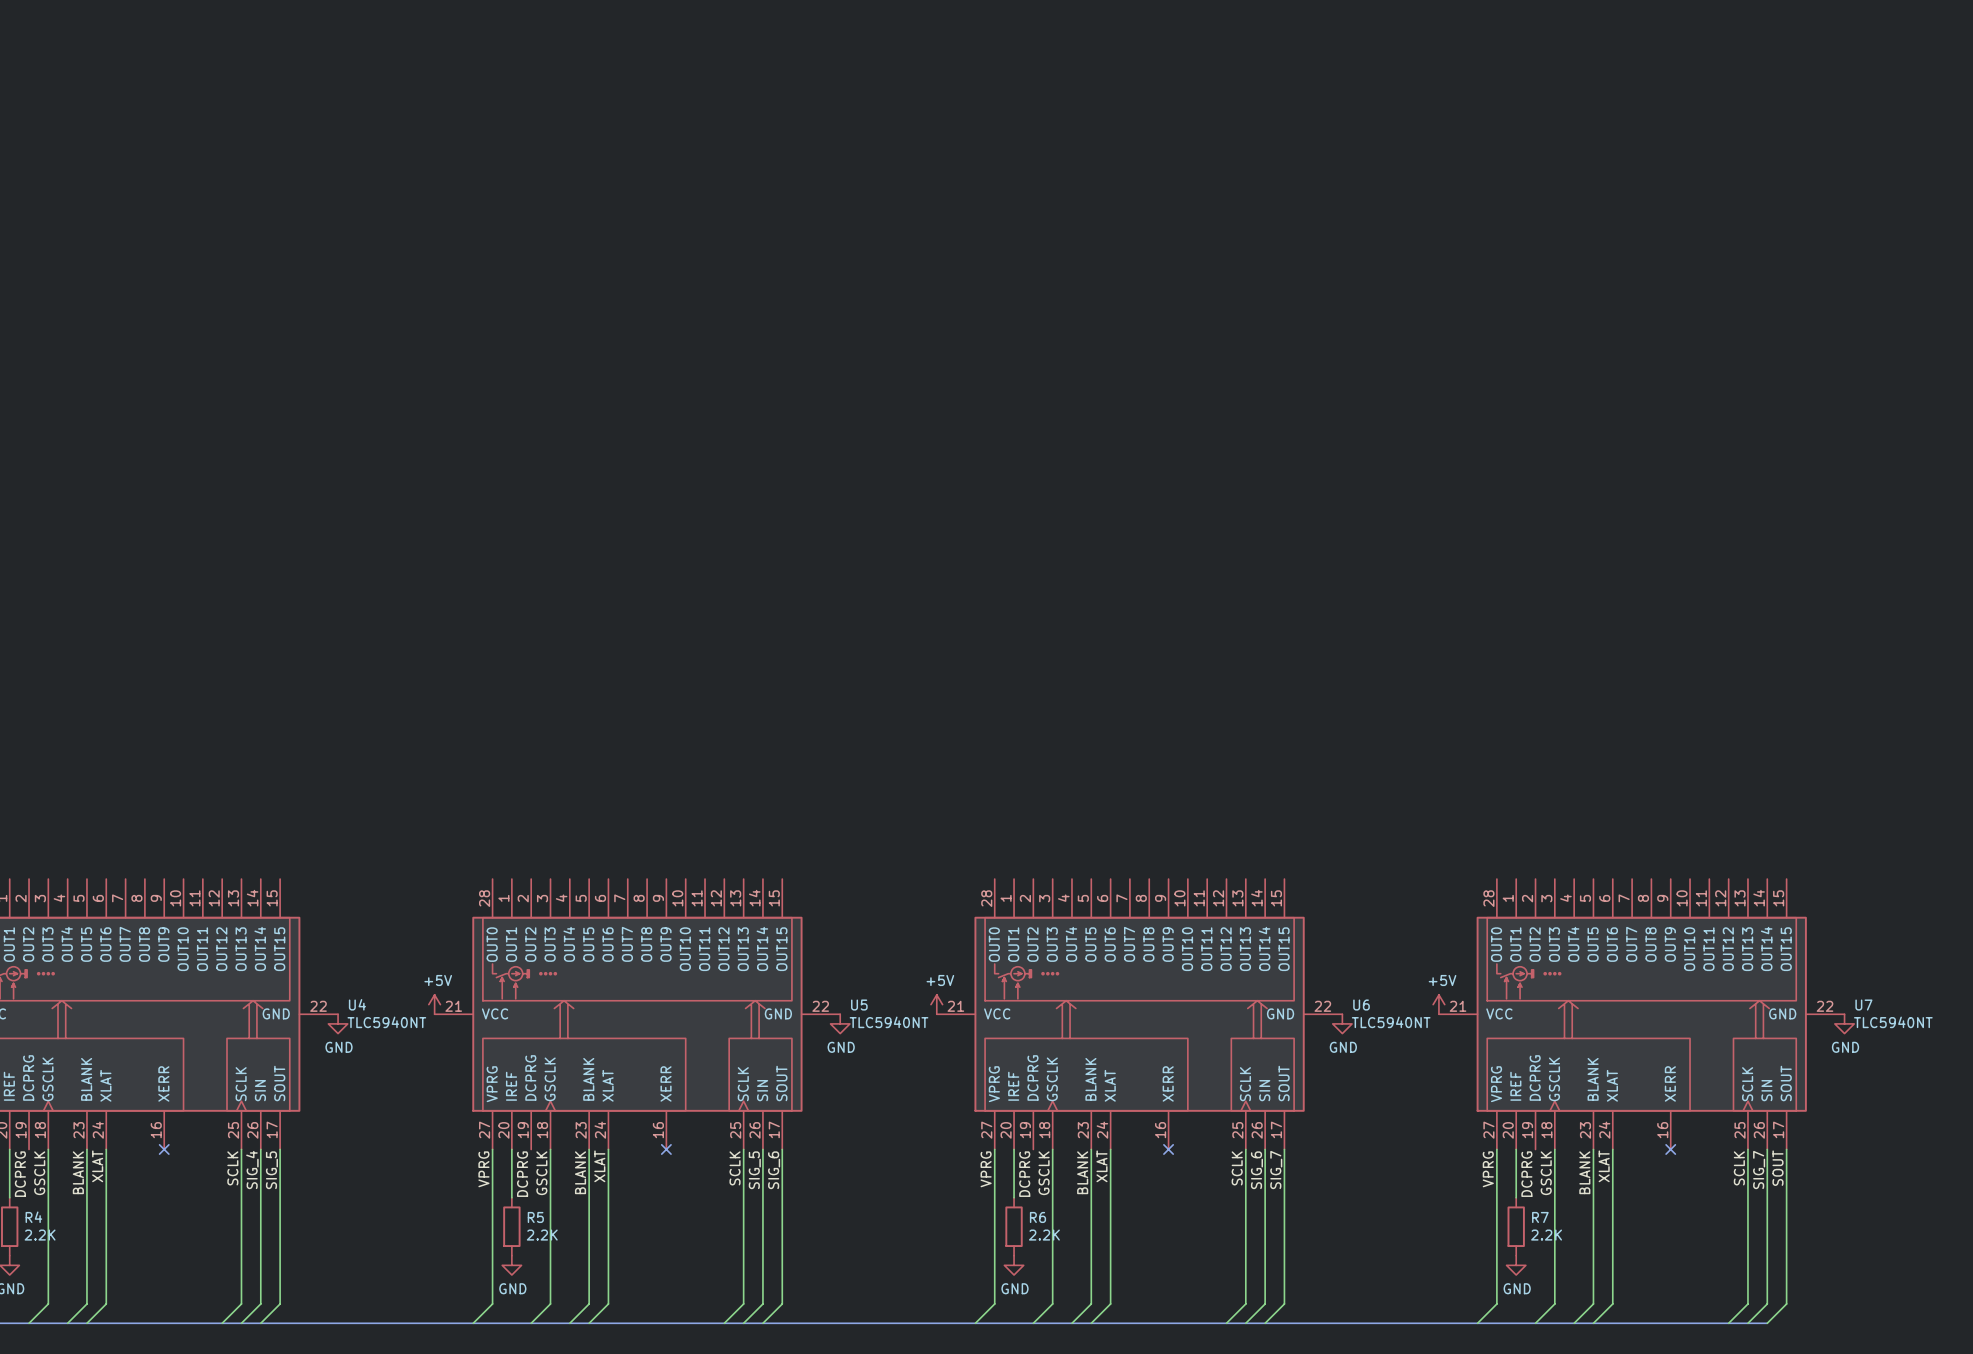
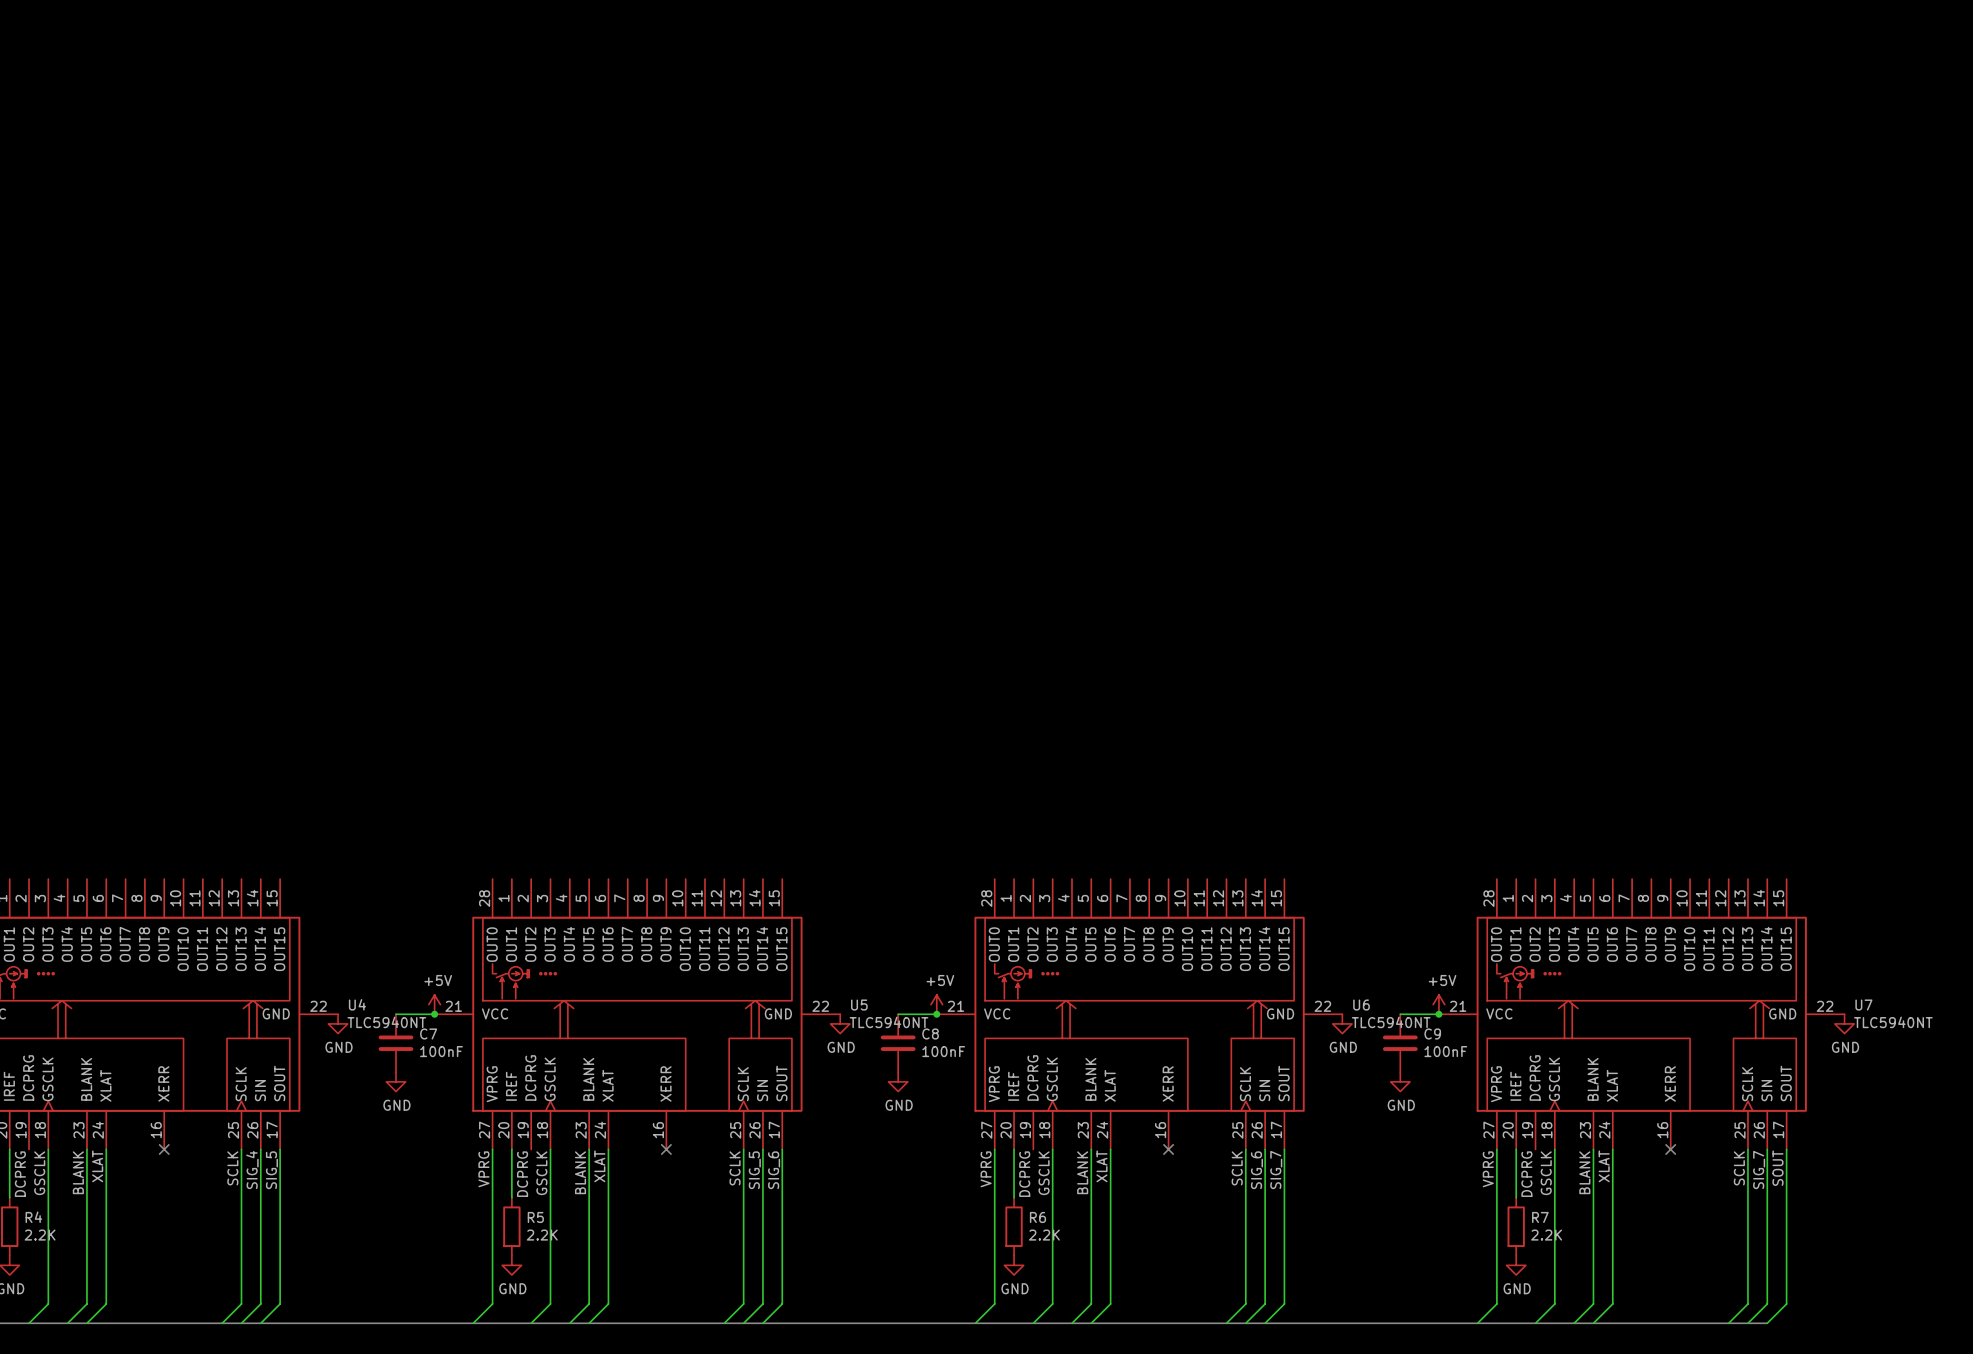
wire: none -> (395, 1014) (434, 1014)
junction: none -> (434, 1014)
wire: none -> (898, 1014) (936, 1014)
junction: none -> (936, 1014)
wire: none -> (1400, 1014) (1438, 1014)
junction: none -> (1438, 1014)
C7: none -> 100nF (395, 1043)
C8: none -> 100nF (898, 1043)
C9: none -> 100nF (1400, 1043)
power symbol: none -> GND (395, 1081)
power symbol: none -> GND (898, 1081)
power symbol: none -> GND (1400, 1081)

